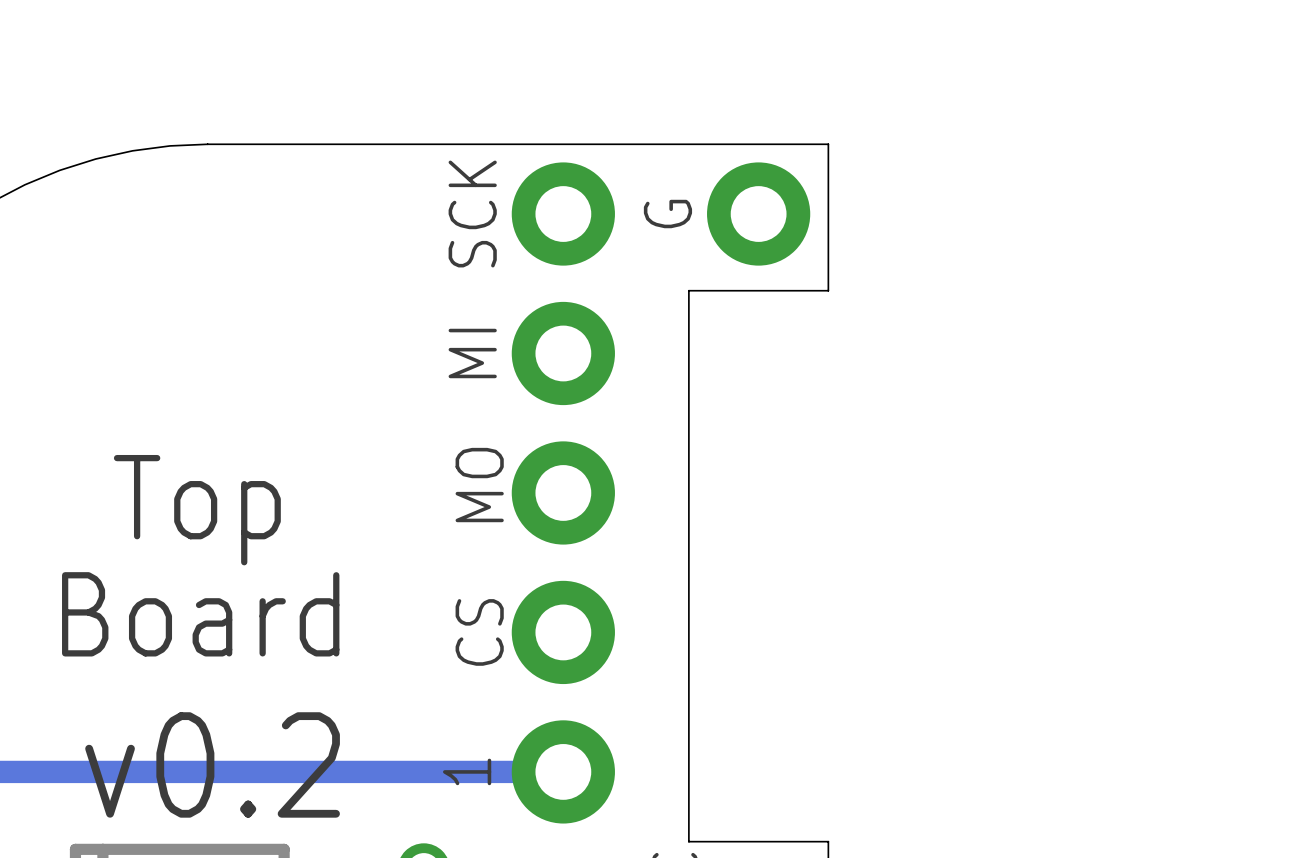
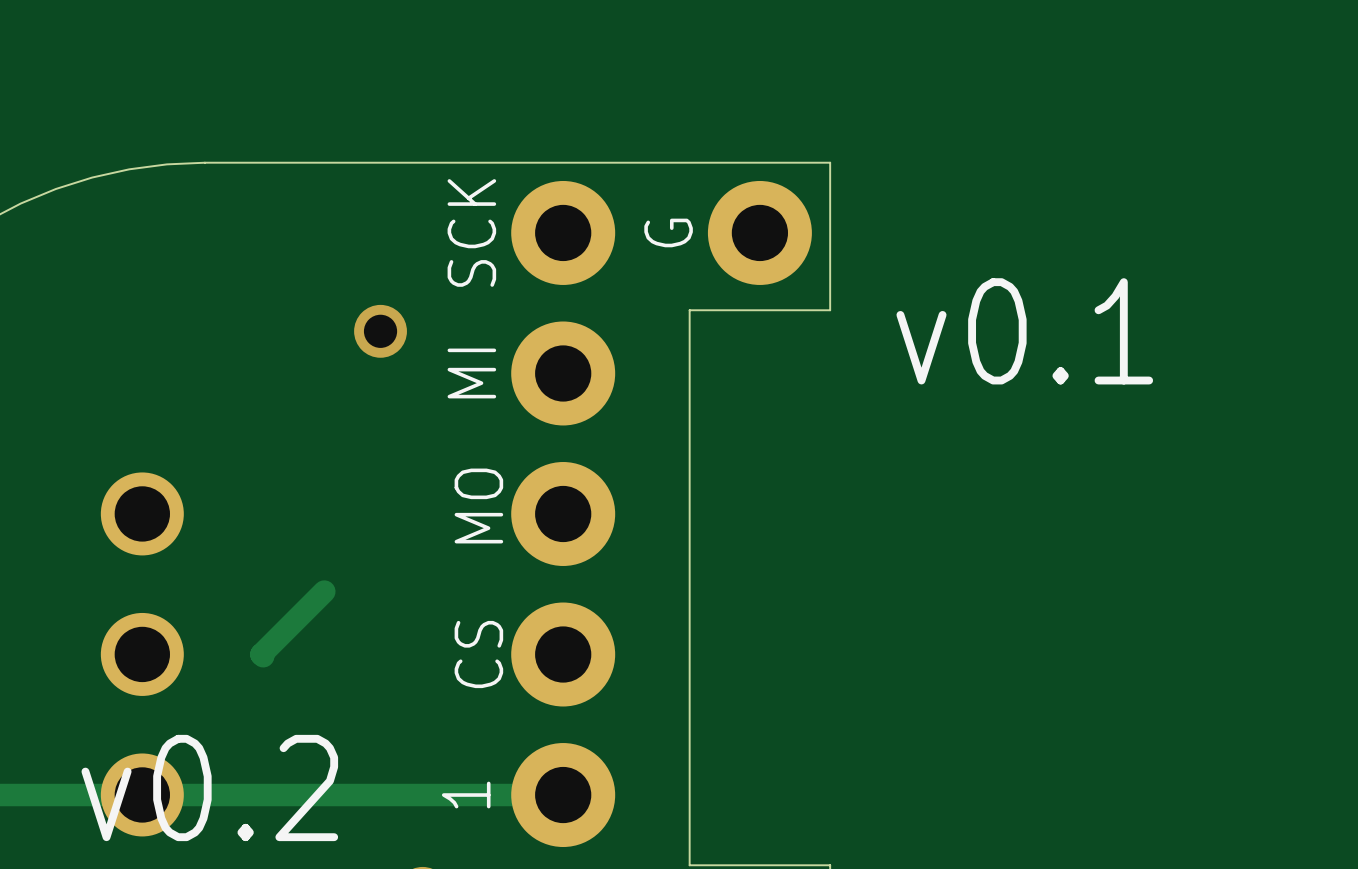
via: none -> (380, 331)
text: none -> v0.1 (1024, 331)
text: Top (197, 510) -> none
track: none -> (324, 591) (261, 654) (263, 656)
text: Board (200, 614) -> none
part: none -> (142, 654)

